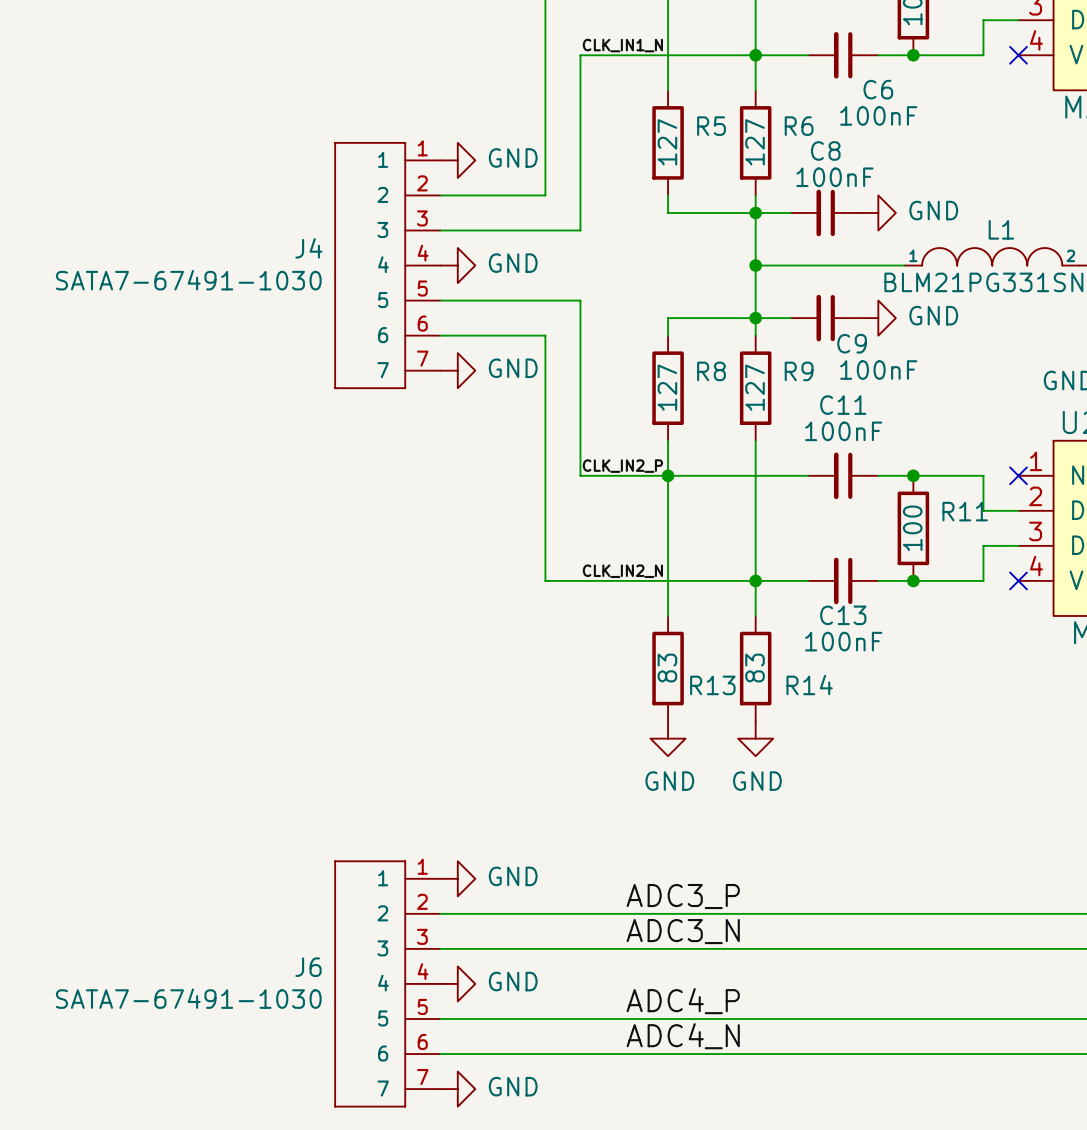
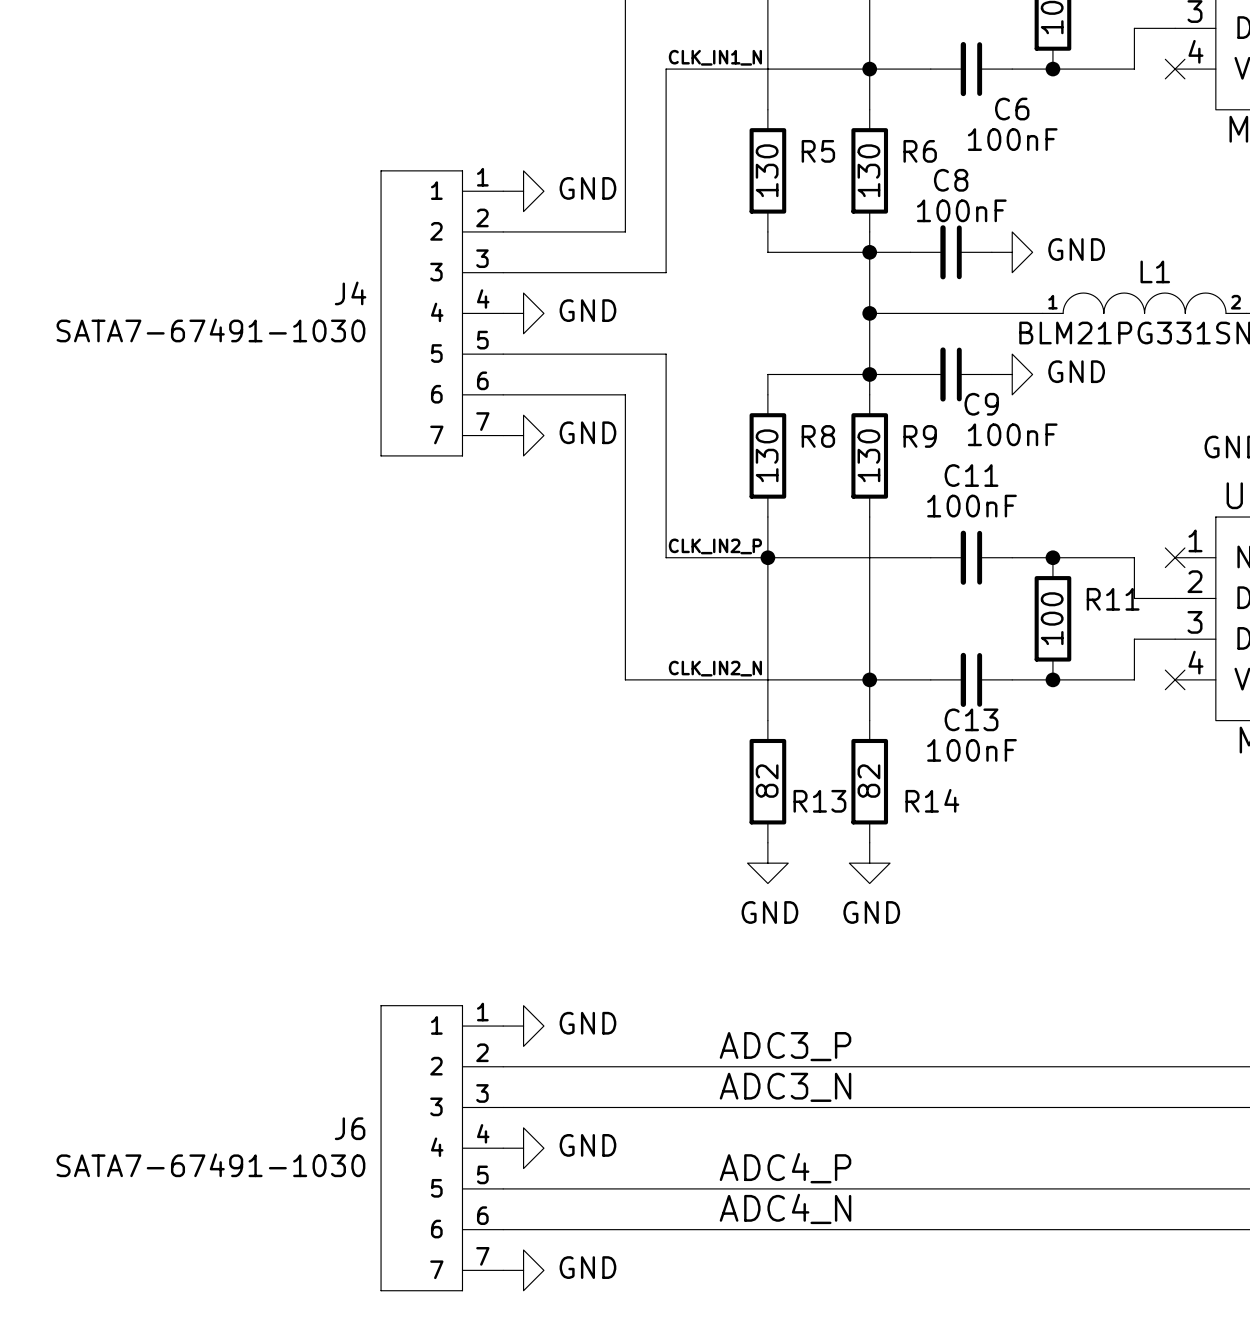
R5 value: 127 (667, 142) -> 130 (767, 170)
R6 value: 127 (755, 142) -> 130 (868, 170)
R8 value: 127 (667, 387) -> 130 (767, 455)
R9 value: 127 (755, 387) -> 130 (868, 455)
R13 value: 83 (667, 668) -> 82 (767, 781)
R14 value: 83 (755, 668) -> 82 (868, 781)

